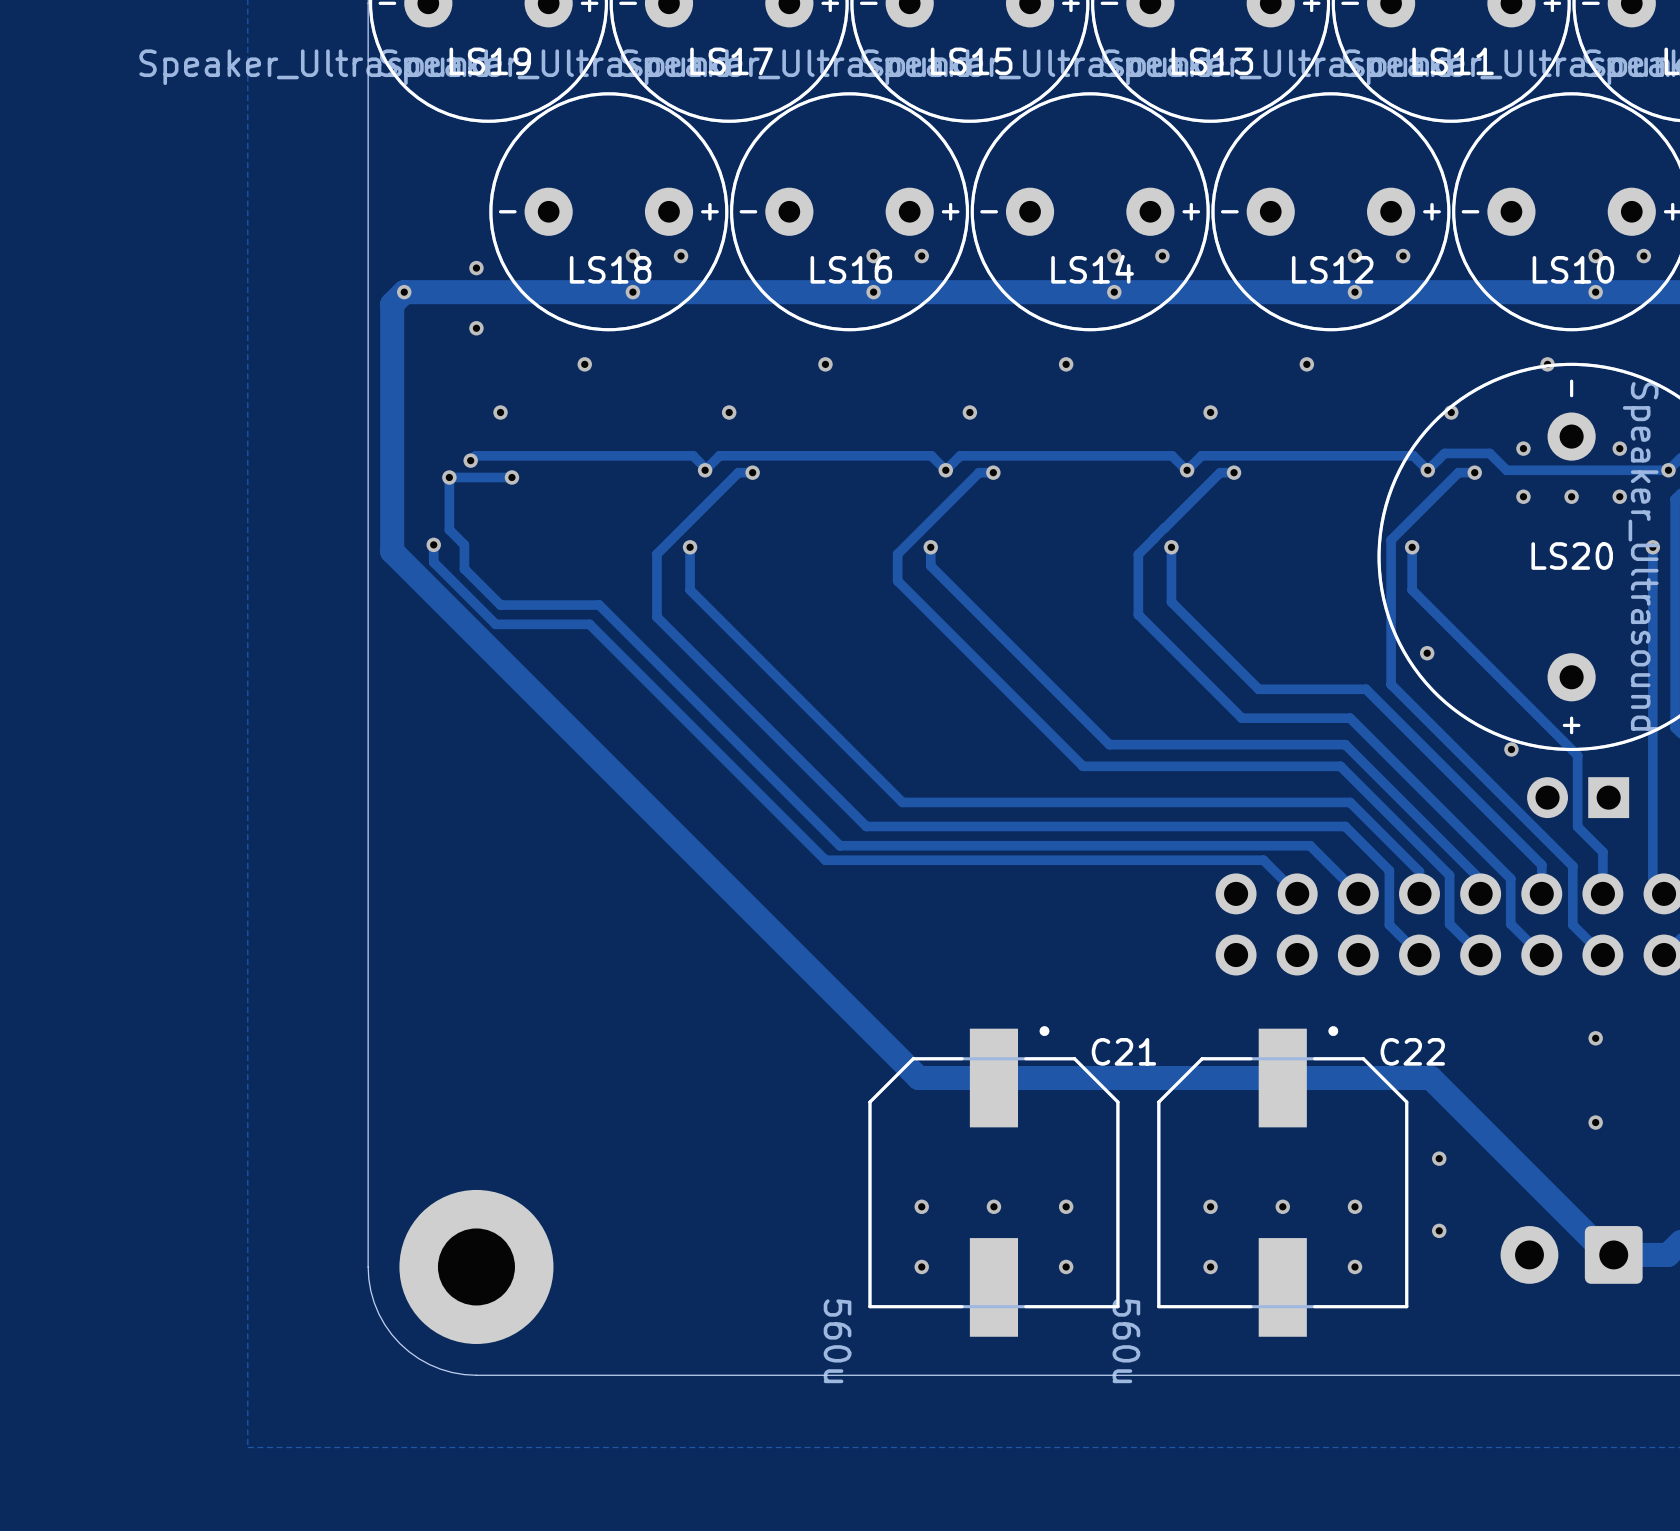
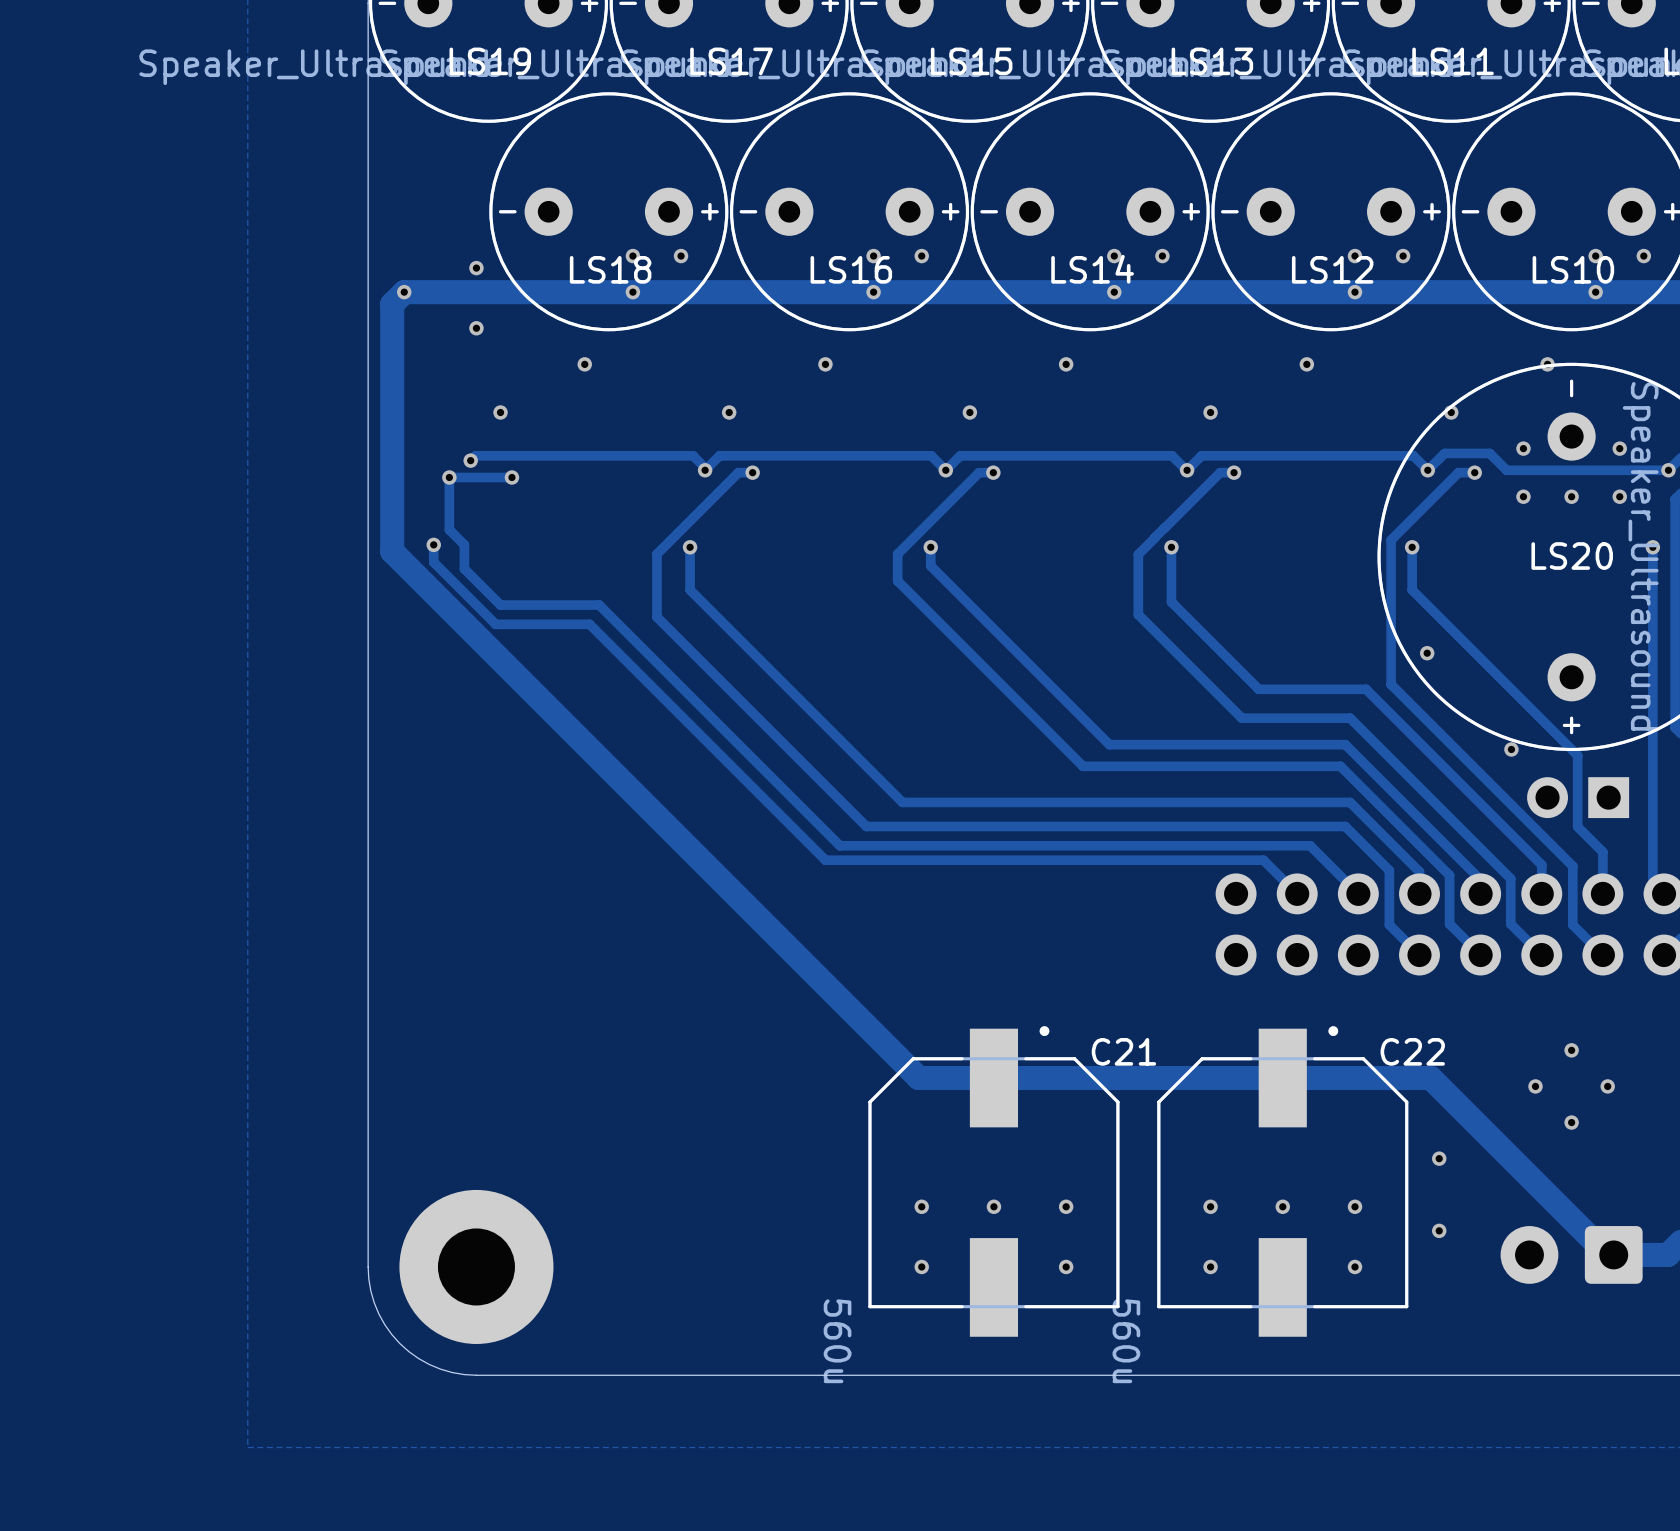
via: (1595, 1038) -> none
via: none -> (1571, 1050)
via: none -> (1535, 1086)
via: none -> (1607, 1086)
via: none -> (1571, 1122)
via: (1595, 1122) -> none

